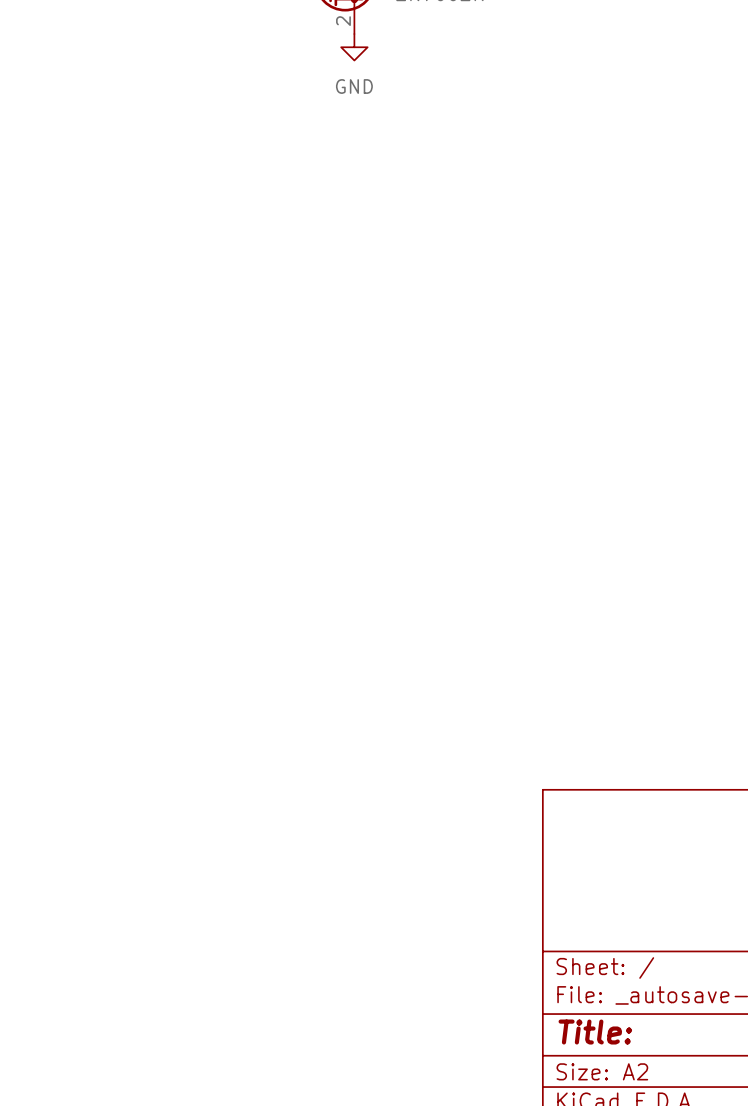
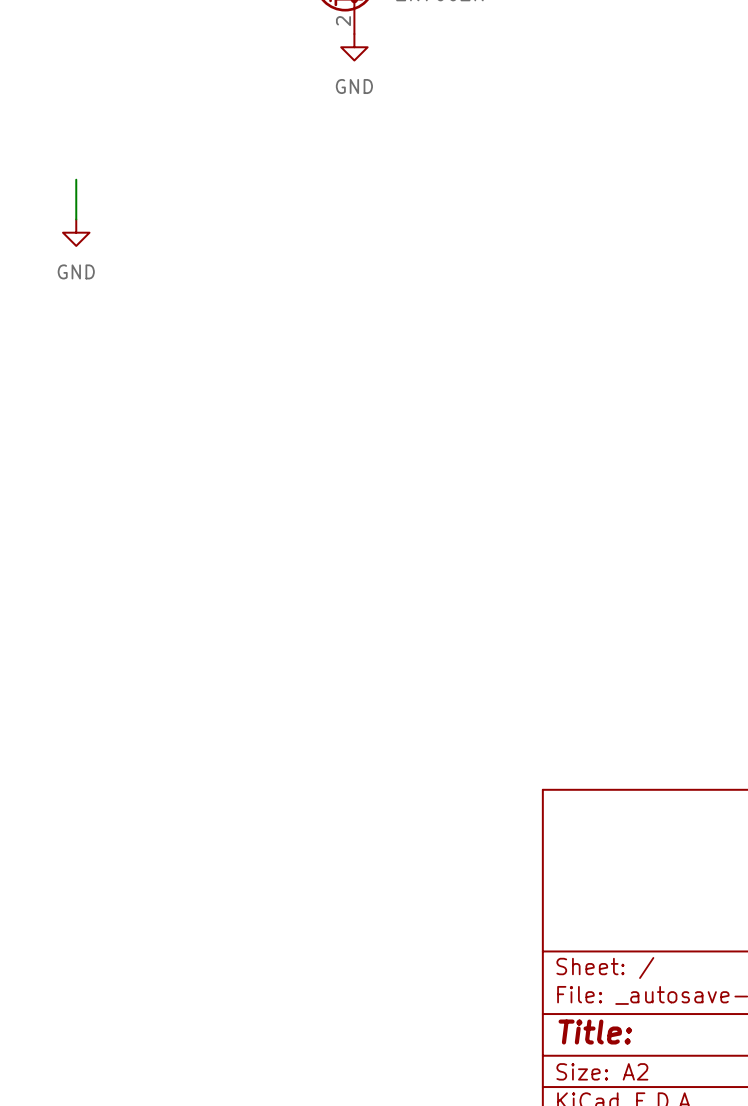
wire: none -> (76, 179) (76, 219)
power symbol: none -> GND (76, 232)

